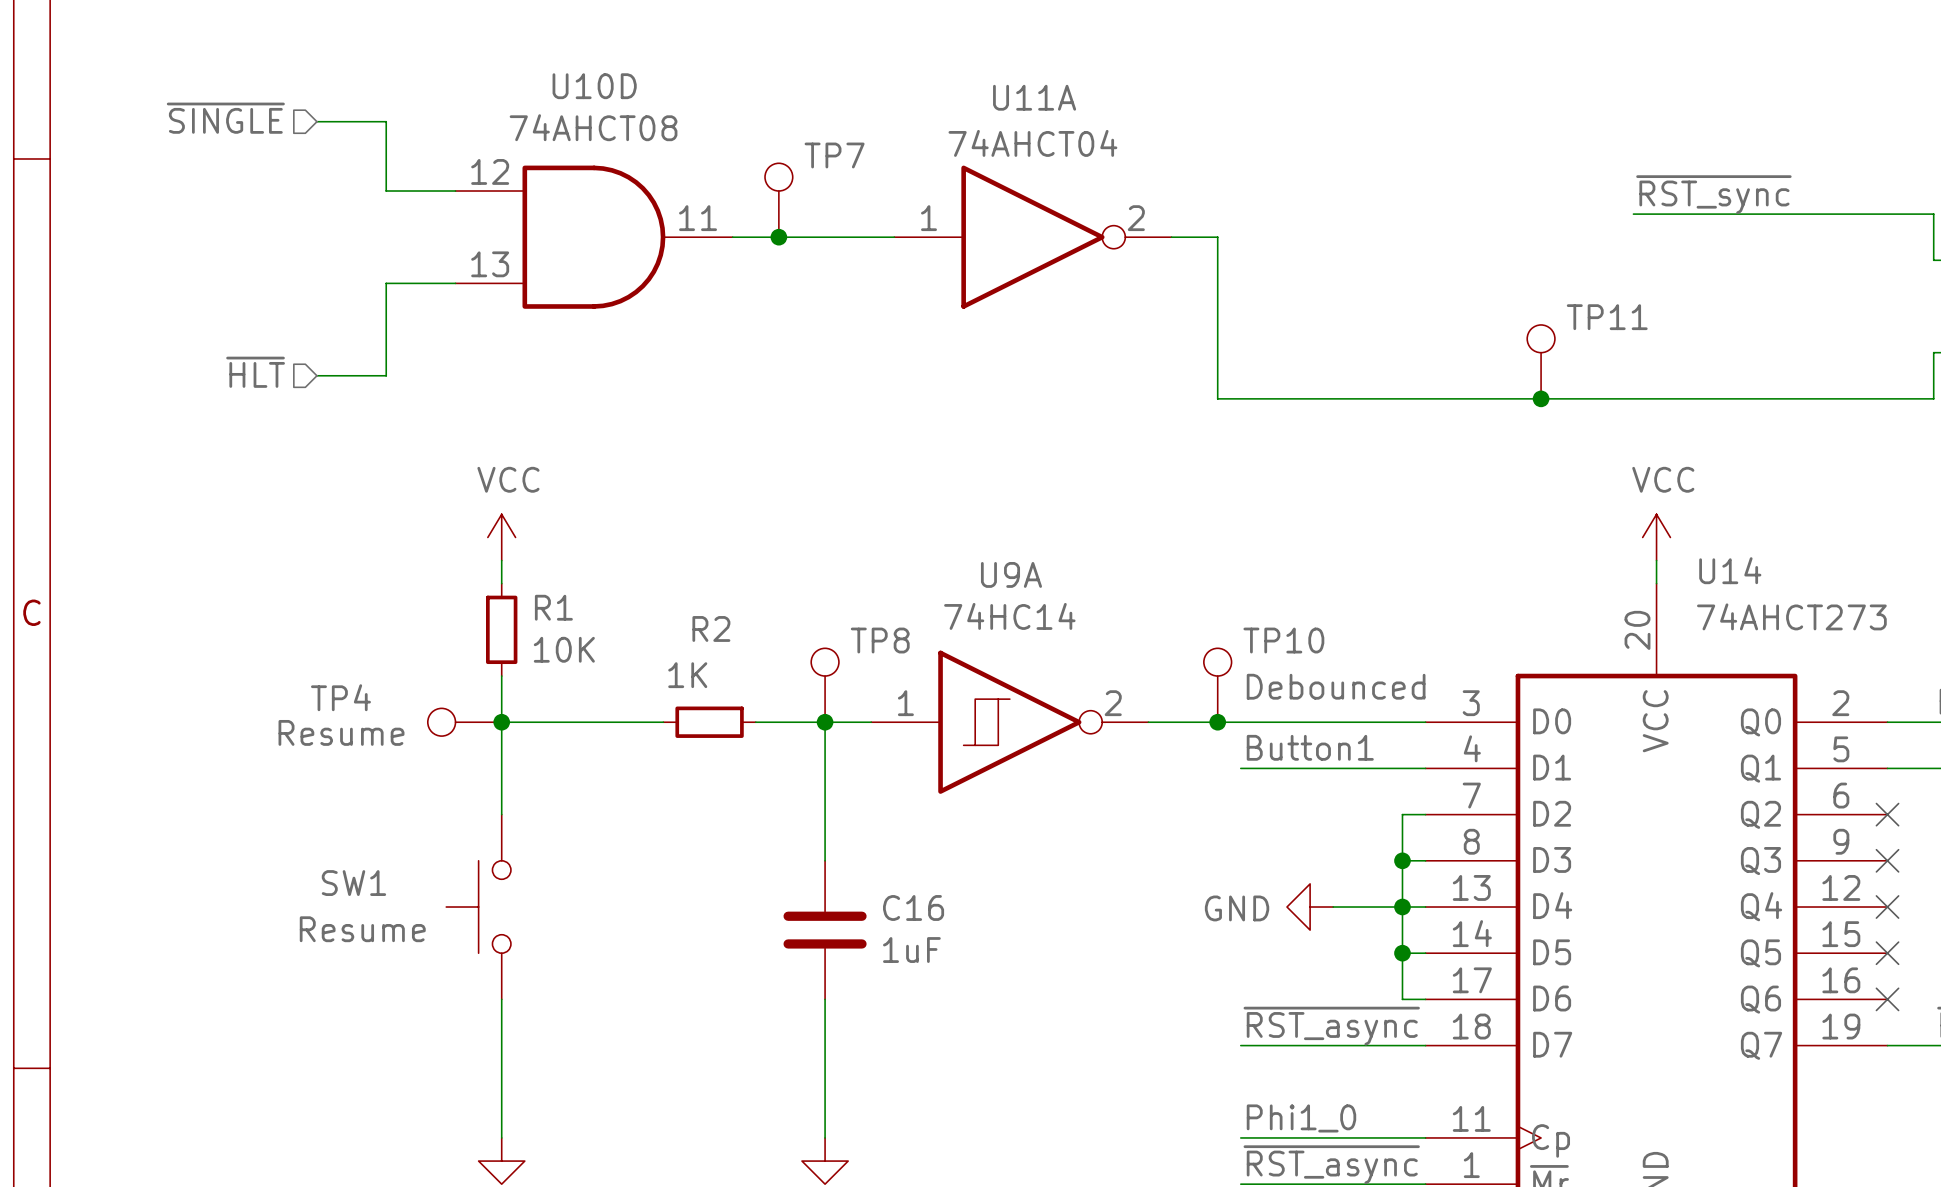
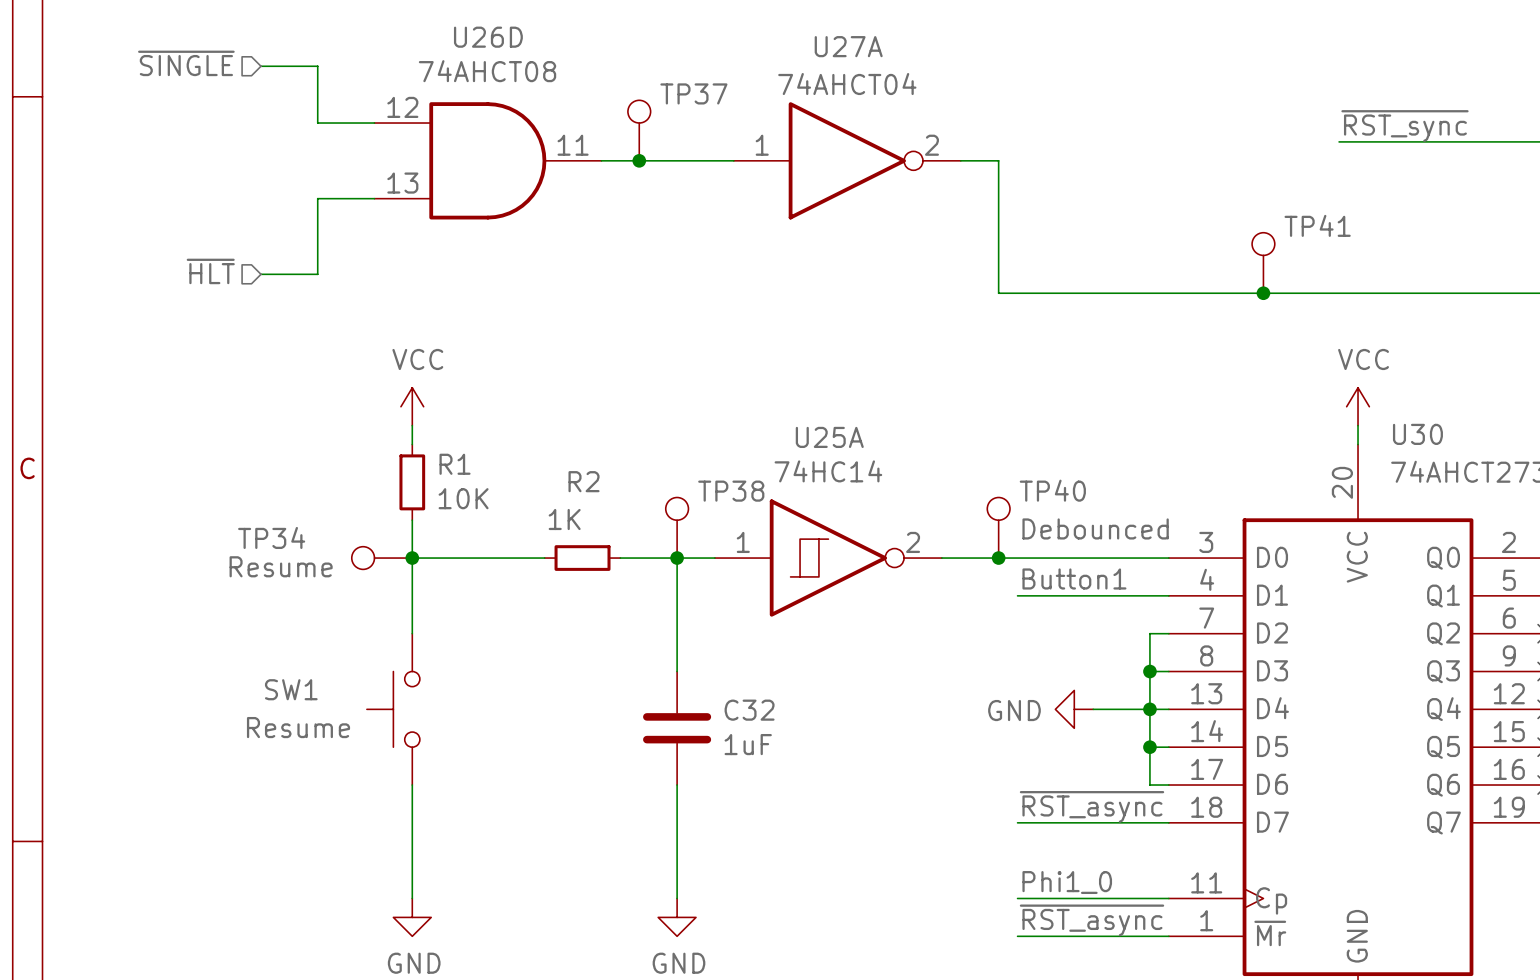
U10D name: U10D (594, 86) -> U26D (488, 37)
U11A name: U11A (1034, 97) -> U27A (848, 46)
TP7 name: TP7 (834, 155) -> TP37 (693, 93)
TP11 name: TP11 (1607, 317) -> TP41 (1317, 225)
U14 name: U14 (1730, 570) -> U30 (1417, 434)
U9A name: U9A (1011, 574) -> U25A (829, 437)
TP8 name: TP8 (880, 640) -> TP38 (731, 491)
TP10 name: TP10 (1283, 640) -> TP40 (1052, 490)
TP4 name: TP4 (340, 697) -> TP34 (271, 537)
C16 name: C16 (913, 907) -> C32 (749, 710)

